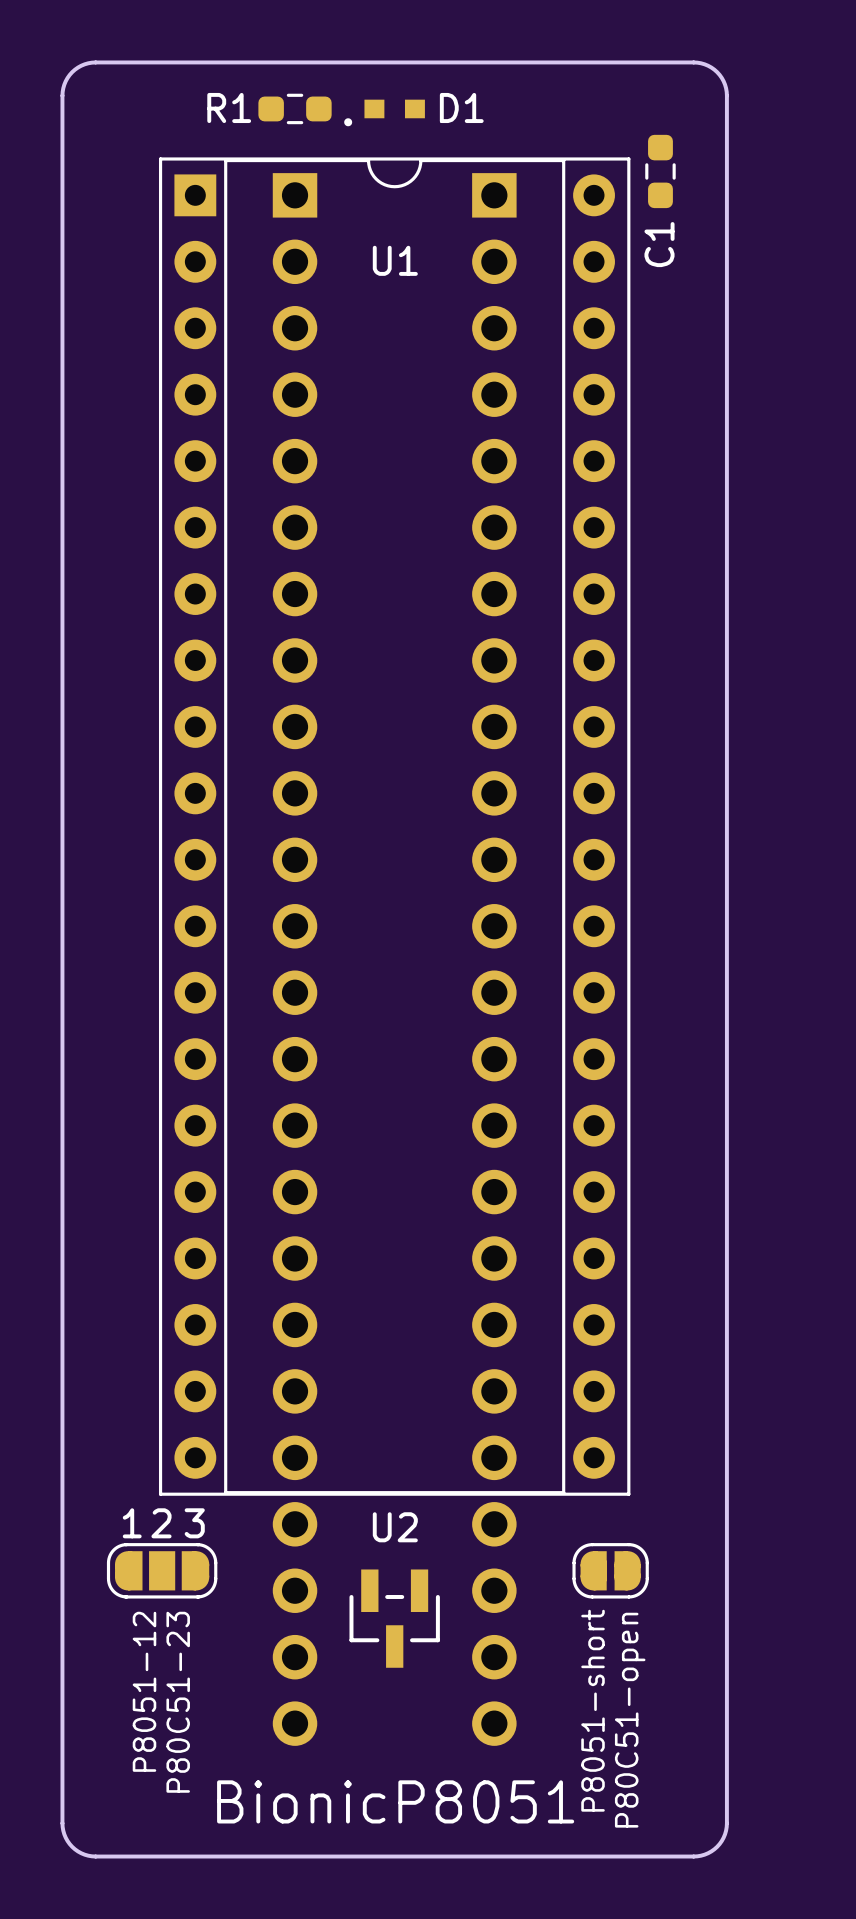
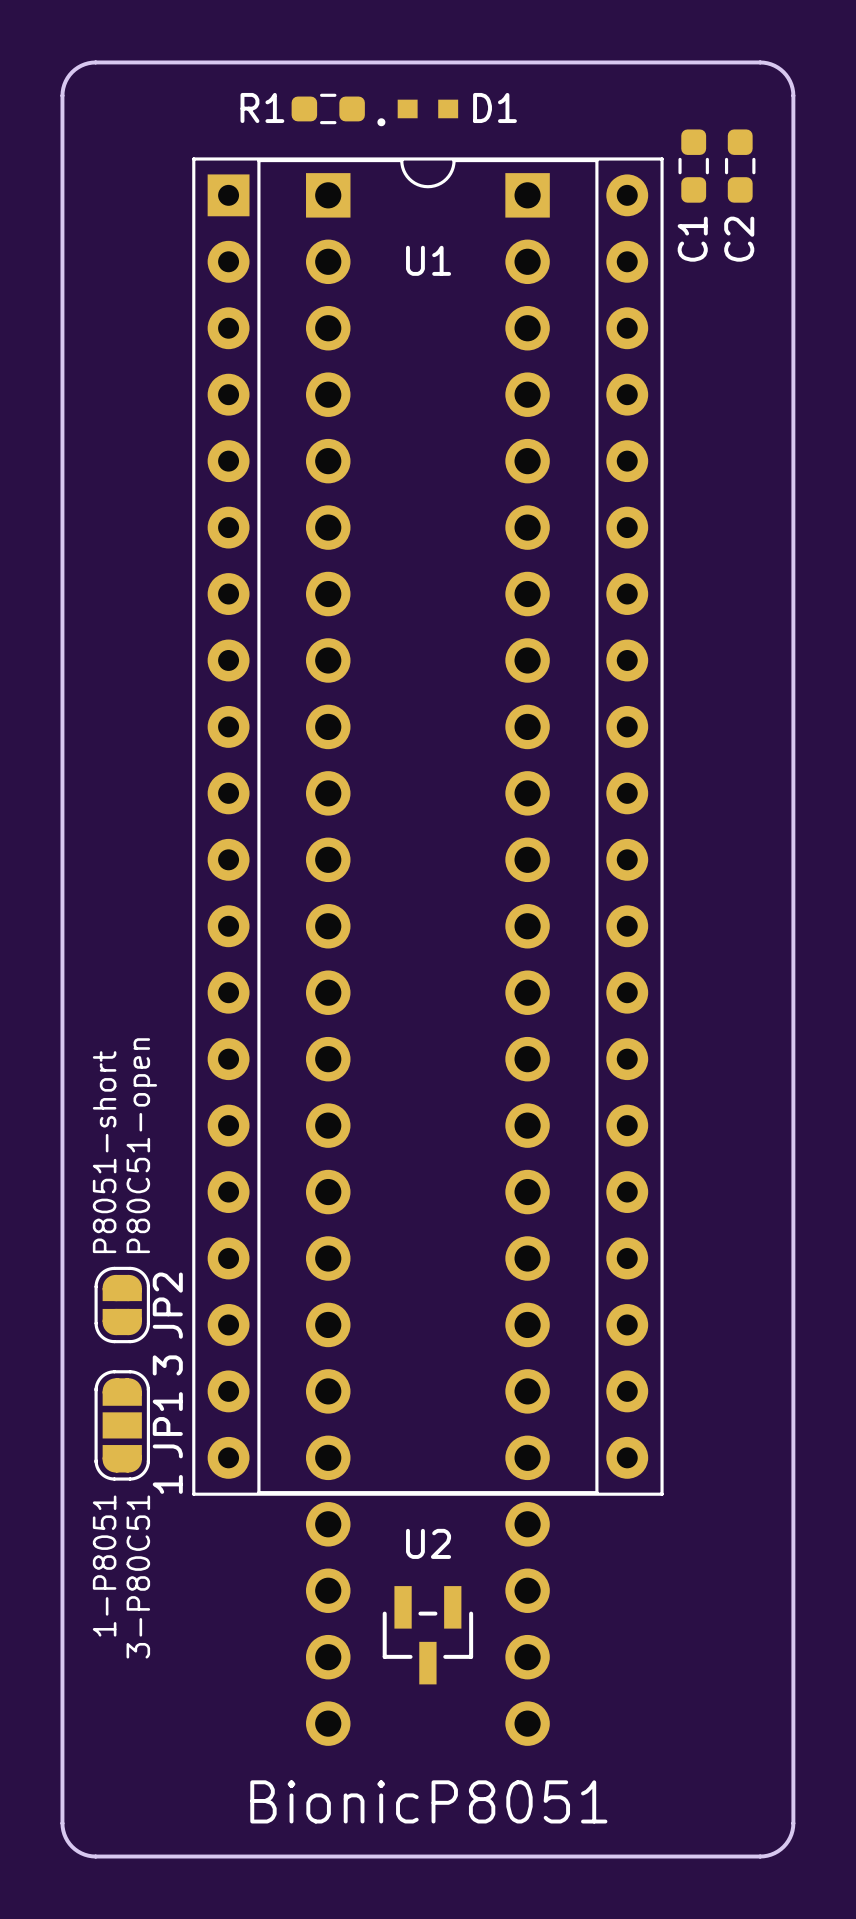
board edge: (693, 62) (708, 65) (717, 72) (725, 84) (726, 95) (726, 1823) (723, 1837) (717, 1846) (704, 1854) (693, 1856) -> (693, 62) (760, 62) (771, 64) (780, 69) (788, 78) (793, 95) (793, 1827) (786, 1844) (771, 1854) (760, 1856) (693, 1856)
R1 position: (295, 108) -> (328, 108)
D1 position: (384, 112) -> (417, 112)
C2: none -> (740, 166)
C1 position: (660, 171) -> (693, 166)
U1 position: (394, 826) -> (427, 826)
part position: (295, 959) -> (328, 959)
part position: (494, 959) -> (527, 959)
JP2: none -> (122, 1305)
JP1: none -> (122, 1425)
text: 2 (161, 1523) -> none
text: none -> 1-P8051 (104, 1566)
part: (162, 1570) -> none
part: (610, 1570) -> none
text: none -> 3-P80C51 (138, 1577)
U2 position: (394, 1618) -> (427, 1635)
text: P8051-12 (144, 1691) -> none
text: P80C51-23 (178, 1702) -> none
text position: P8051-short (593, 1710) -> P8051-short (104, 1152)
text position: P80C51-open (630, 1720) -> P80C51-open (141, 1145)
text position: BionicP8051 (395, 1801) -> BionicP8051 (428, 1801)

